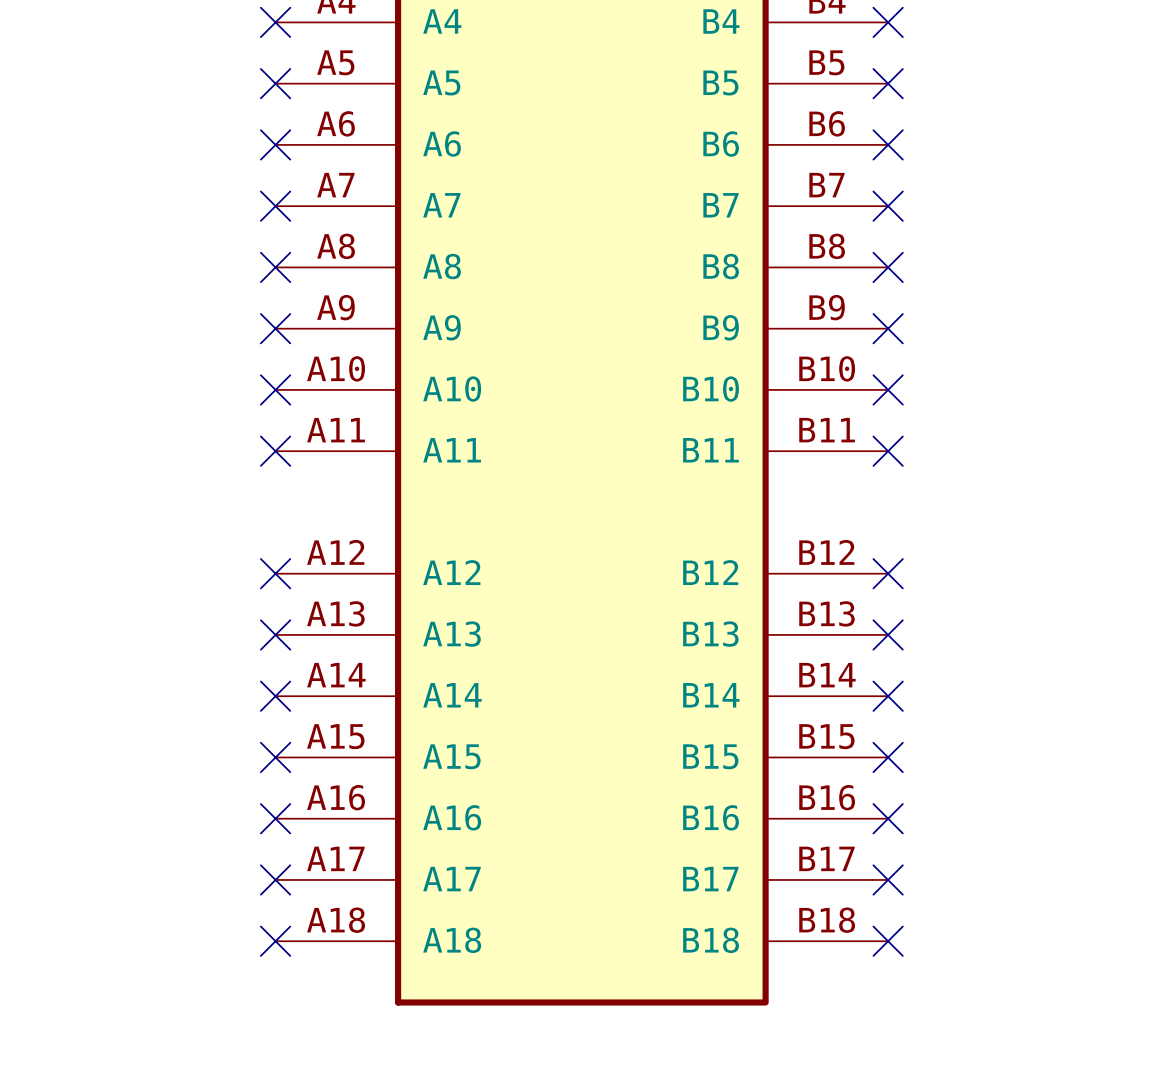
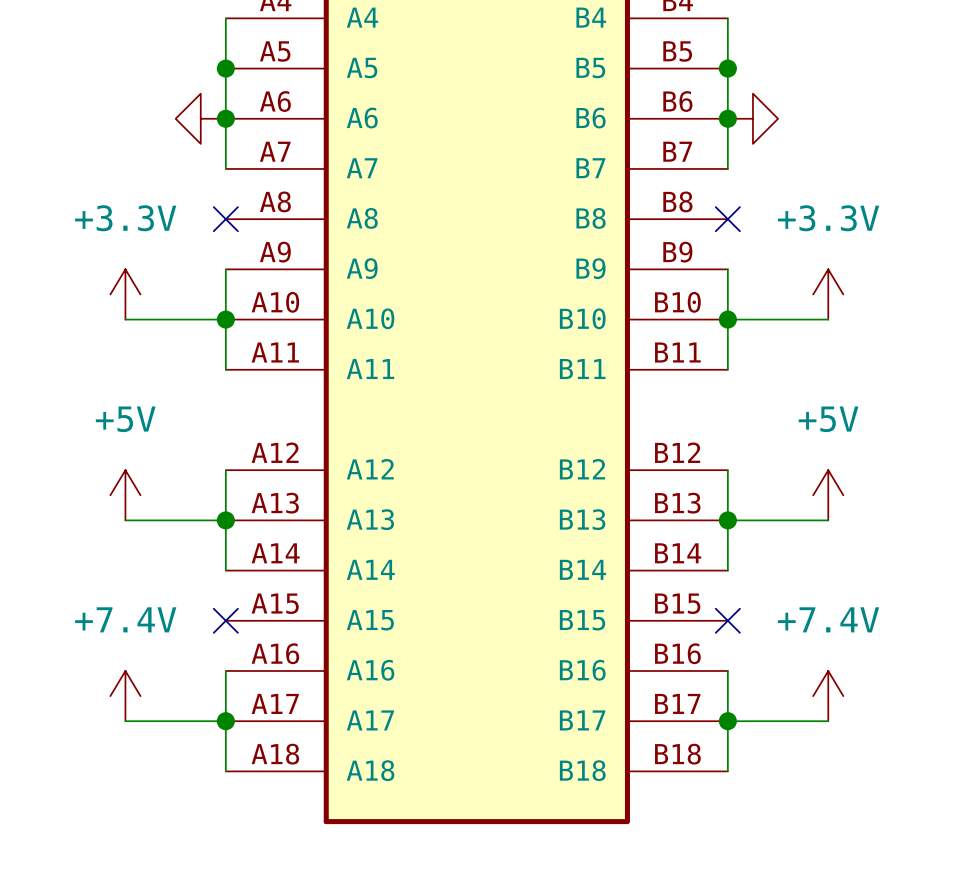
wire: none -> (225, 18) (225, 168)
no-connect mark: (275, 22) -> none
wire: none -> (727, 18) (727, 168)
no-connect mark: (888, 22) -> none
no-connect mark: (275, 83) -> none
junction: none -> (225, 68)
no-connect mark: (888, 83) -> none
junction: none -> (727, 68)
power symbol: none -> (200, 118)
no-connect mark: (275, 144) -> none
junction: none -> (225, 118)
no-connect mark: (888, 144) -> none
junction: none -> (727, 118)
power symbol: none -> (752, 118)
no-connect mark: (275, 206) -> none
no-connect mark: (888, 206) -> none
wire: none -> (225, 269) (225, 369)
no-connect mark: (275, 328) -> none
wire: none -> (727, 269) (727, 369)
no-connect mark: (888, 328) -> none
power symbol: none -> +3.3V (125, 294)
power symbol: none -> +3.3V (828, 294)
wire: none -> (125, 319) (225, 319)
no-connect mark: (275, 389) -> none
junction: none -> (225, 319)
wire: none -> (727, 319) (828, 319)
no-connect mark: (888, 389) -> none
junction: none -> (727, 319)
no-connect mark: (275, 451) -> none
no-connect mark: (888, 451) -> none
wire: none -> (225, 470) (225, 570)
no-connect mark: (275, 573) -> none
wire: none -> (727, 470) (727, 570)
no-connect mark: (888, 573) -> none
power symbol: none -> +5V (125, 495)
power symbol: none -> +5V (828, 495)
wire: none -> (125, 520) (225, 520)
no-connect mark: (275, 634) -> none
junction: none -> (225, 520)
wire: none -> (727, 520) (828, 520)
no-connect mark: (888, 634) -> none
junction: none -> (727, 520)
no-connect mark: (275, 696) -> none
no-connect mark: (888, 696) -> none
wire: none -> (225, 670) (225, 771)
no-connect mark: (275, 818) -> none
wire: none -> (727, 670) (727, 771)
no-connect mark: (888, 818) -> none
power symbol: none -> +7.4V (125, 696)
power symbol: none -> +7.4V (828, 696)
wire: none -> (125, 721) (225, 721)
no-connect mark: (275, 879) -> none
junction: none -> (225, 721)
wire: none -> (727, 721) (828, 721)
no-connect mark: (888, 879) -> none
junction: none -> (727, 721)
no-connect mark: (275, 941) -> none
no-connect mark: (888, 941) -> none

